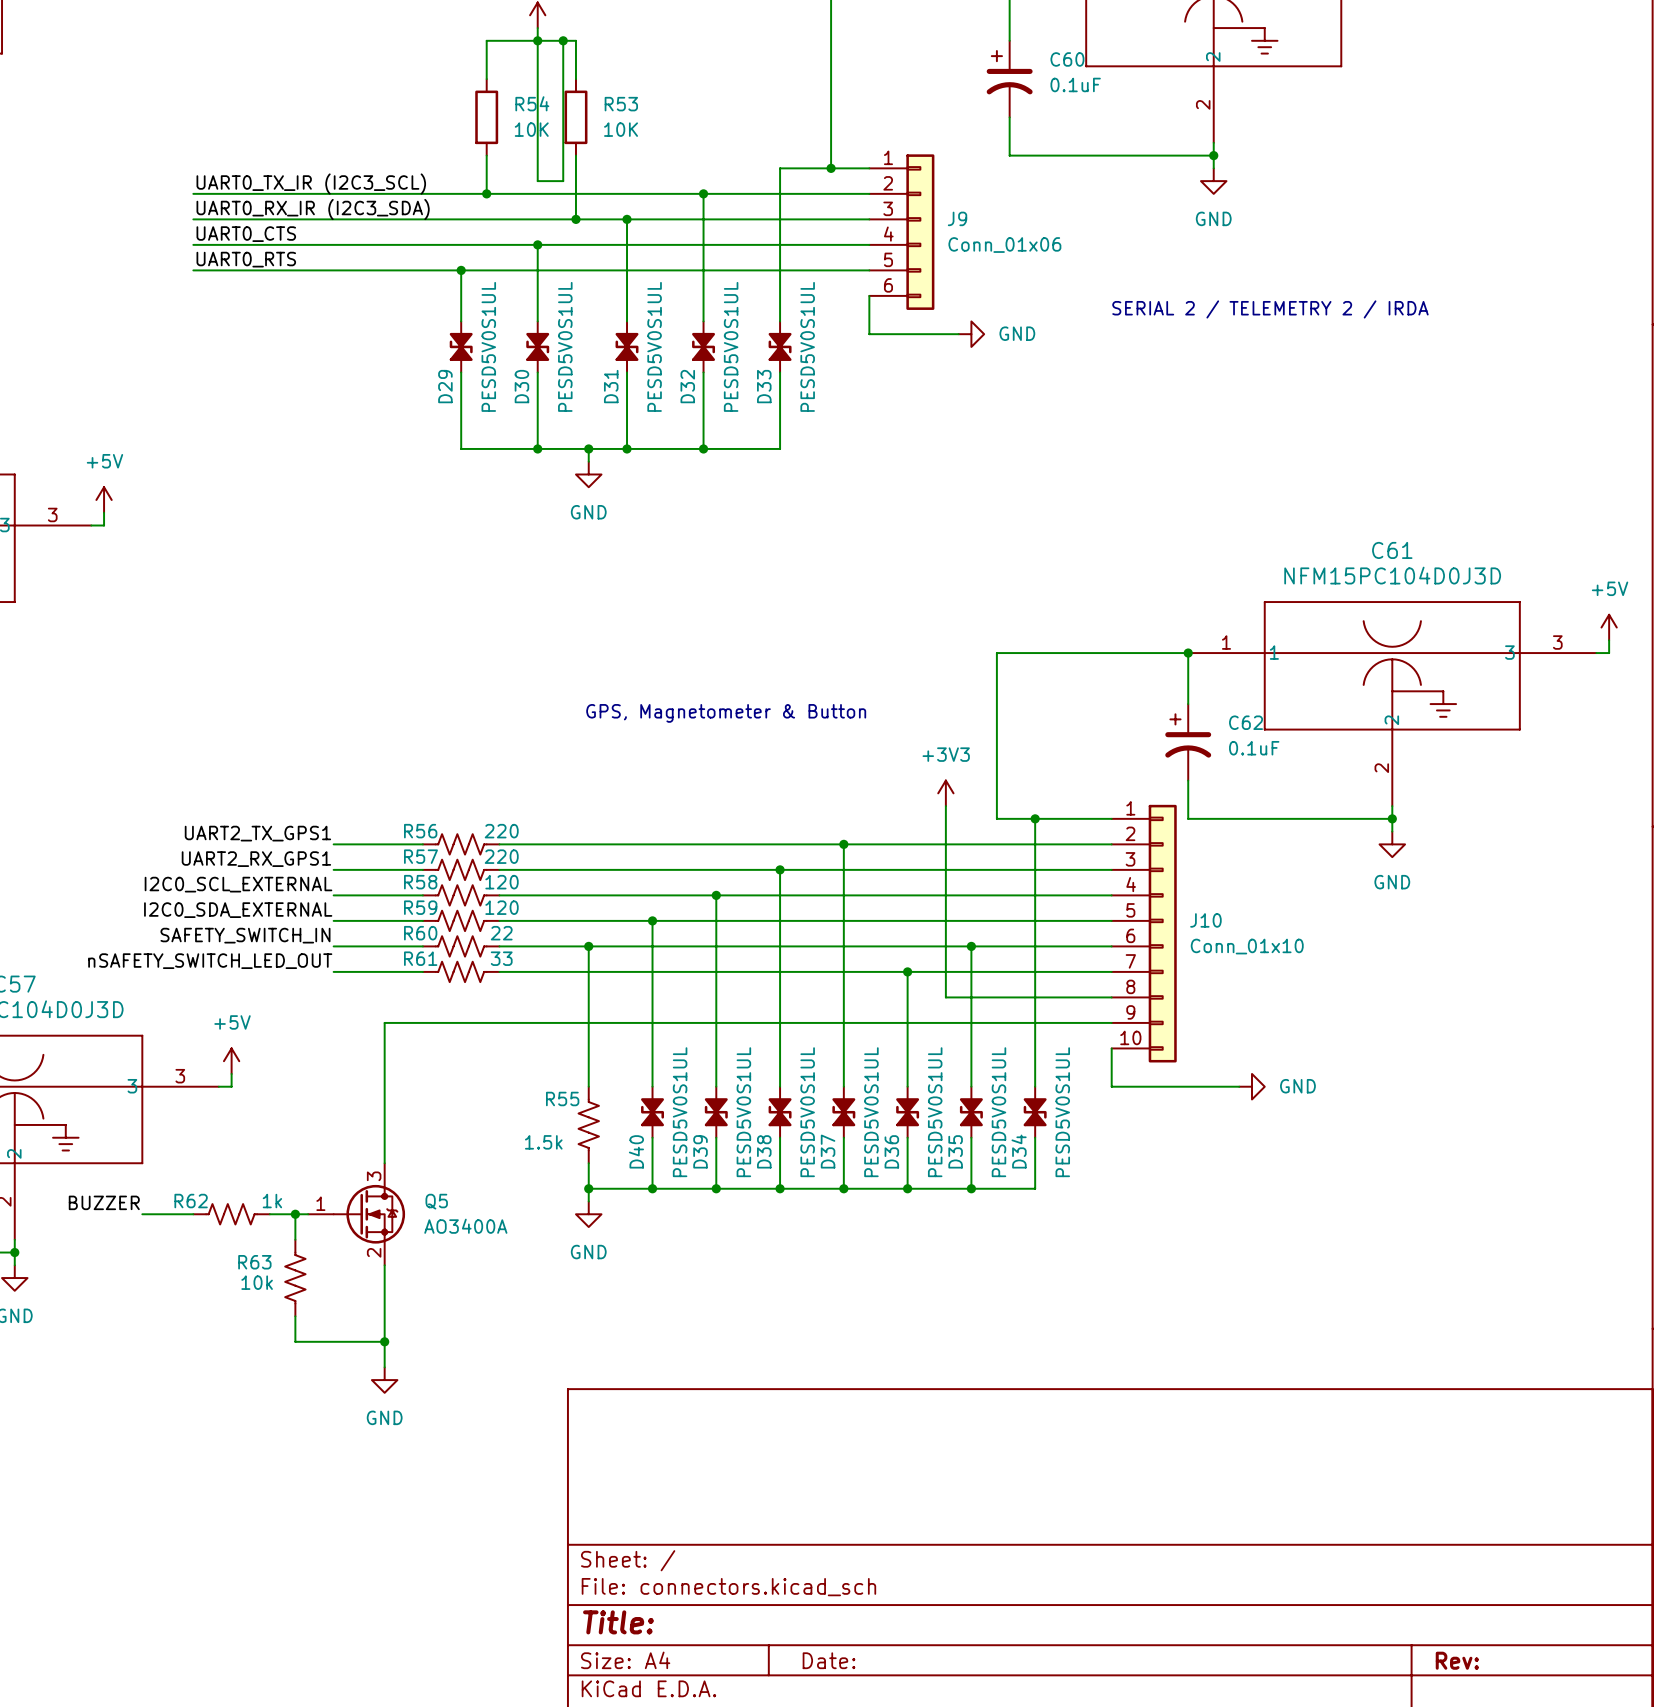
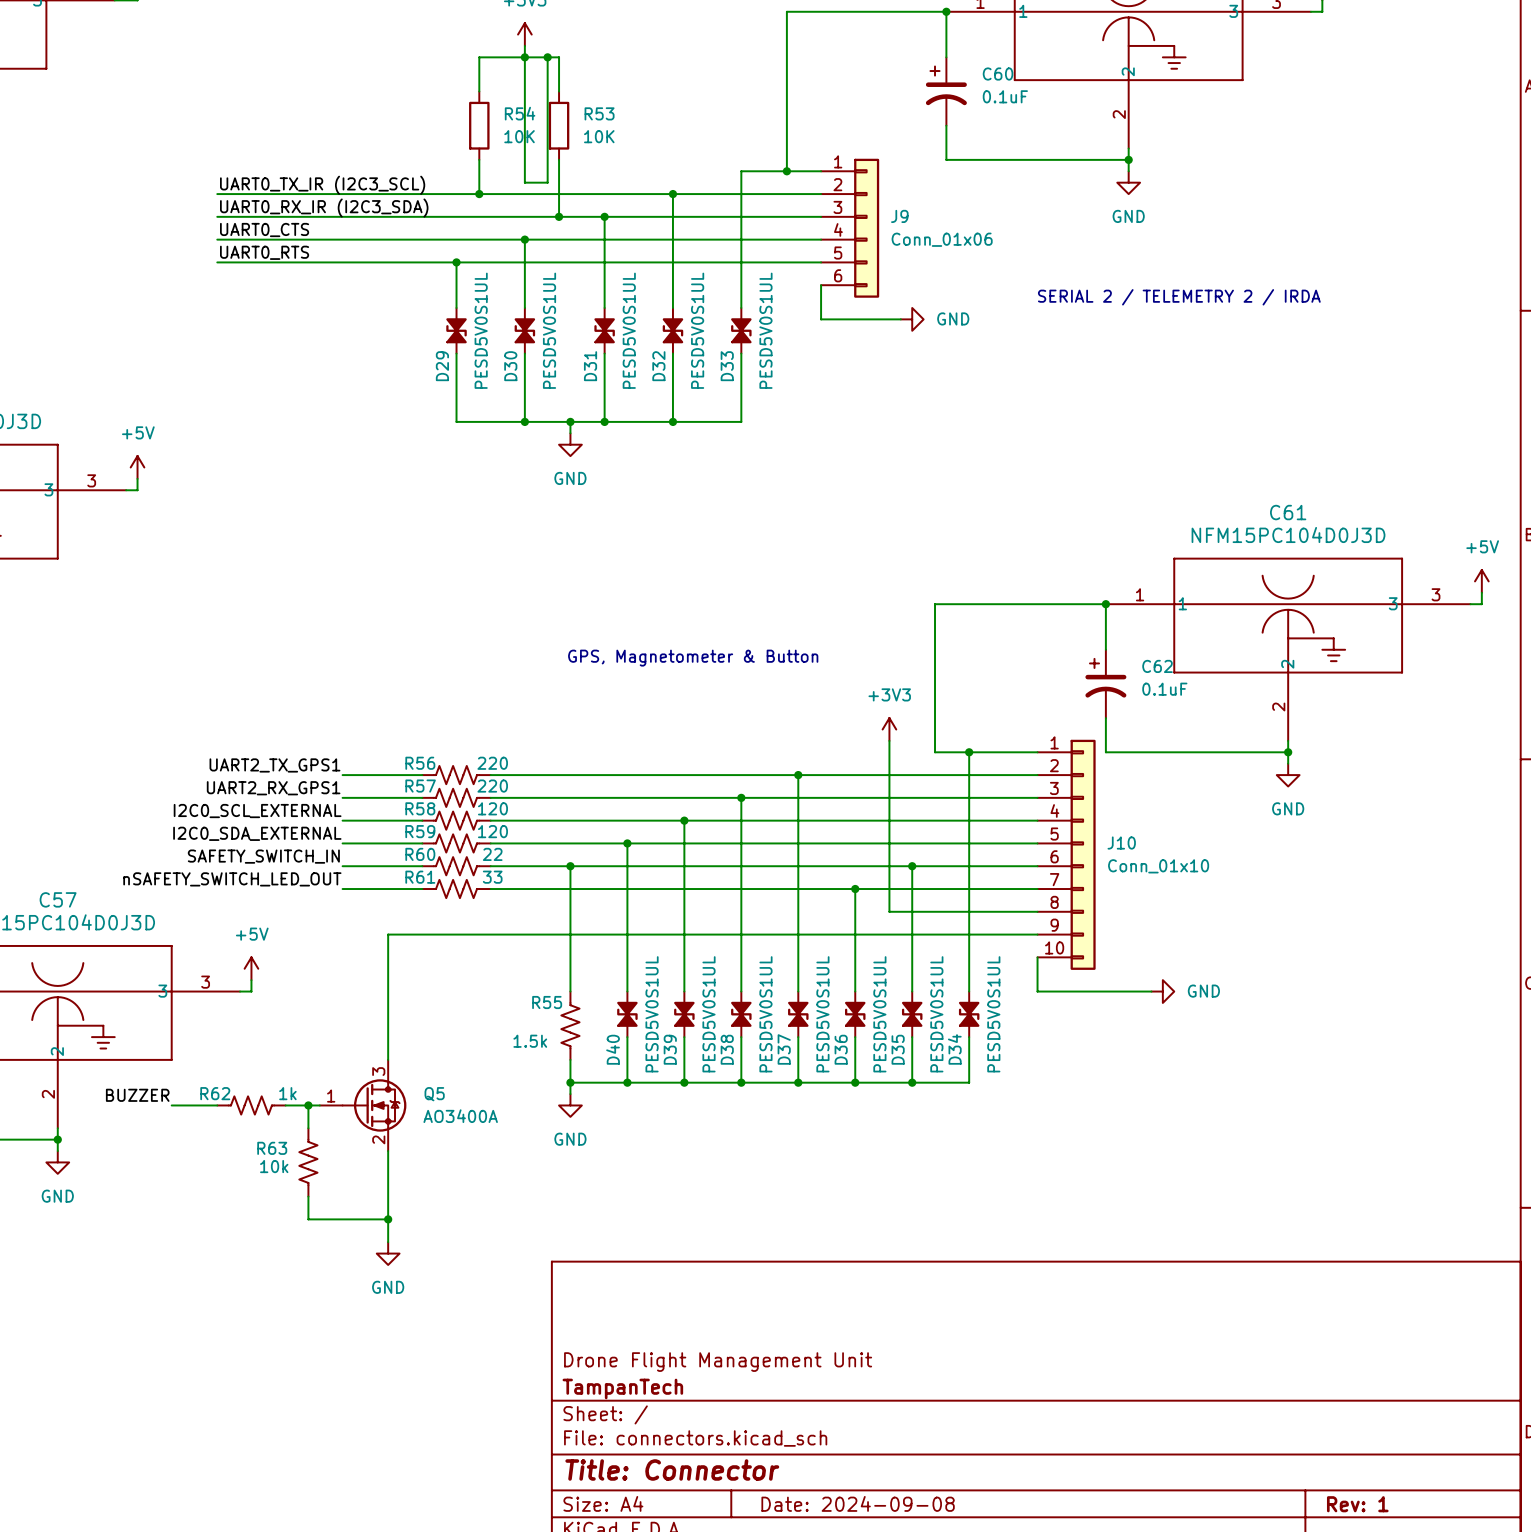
title block: none -> Drone Flight Management Unit (718, 1362)
title block: none -> TampanTech (622, 1388)
title block: Title: (618, 1622) -> Title: Connector (672, 1469)
title block: Date: (829, 1660) -> Date: 2024-09-08 (858, 1503)
title block: Rev: (1457, 1660) -> Rev: 1 (1357, 1504)

